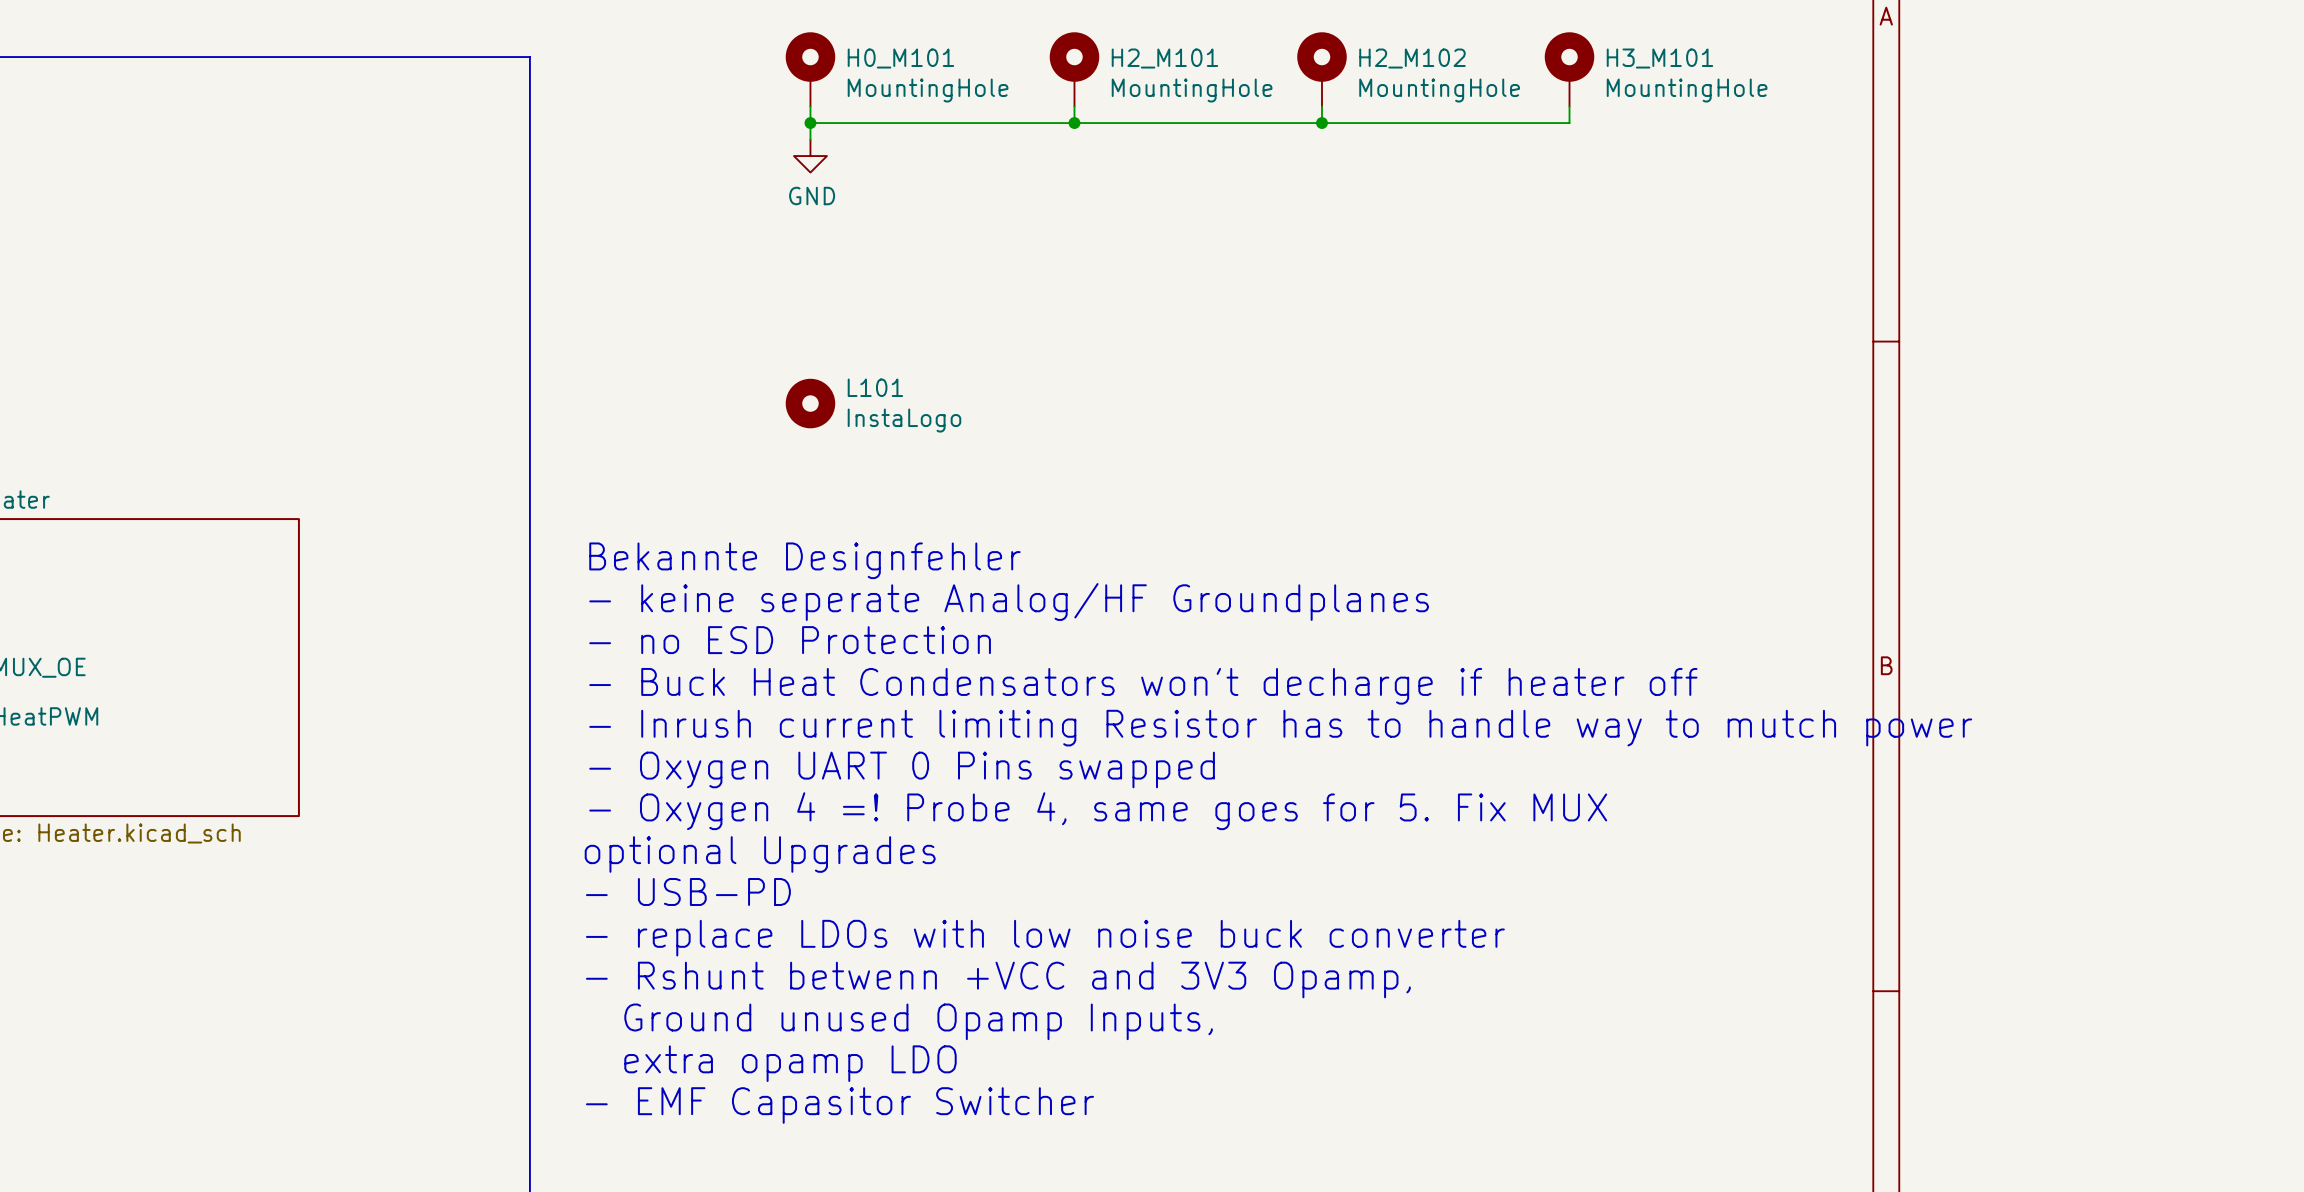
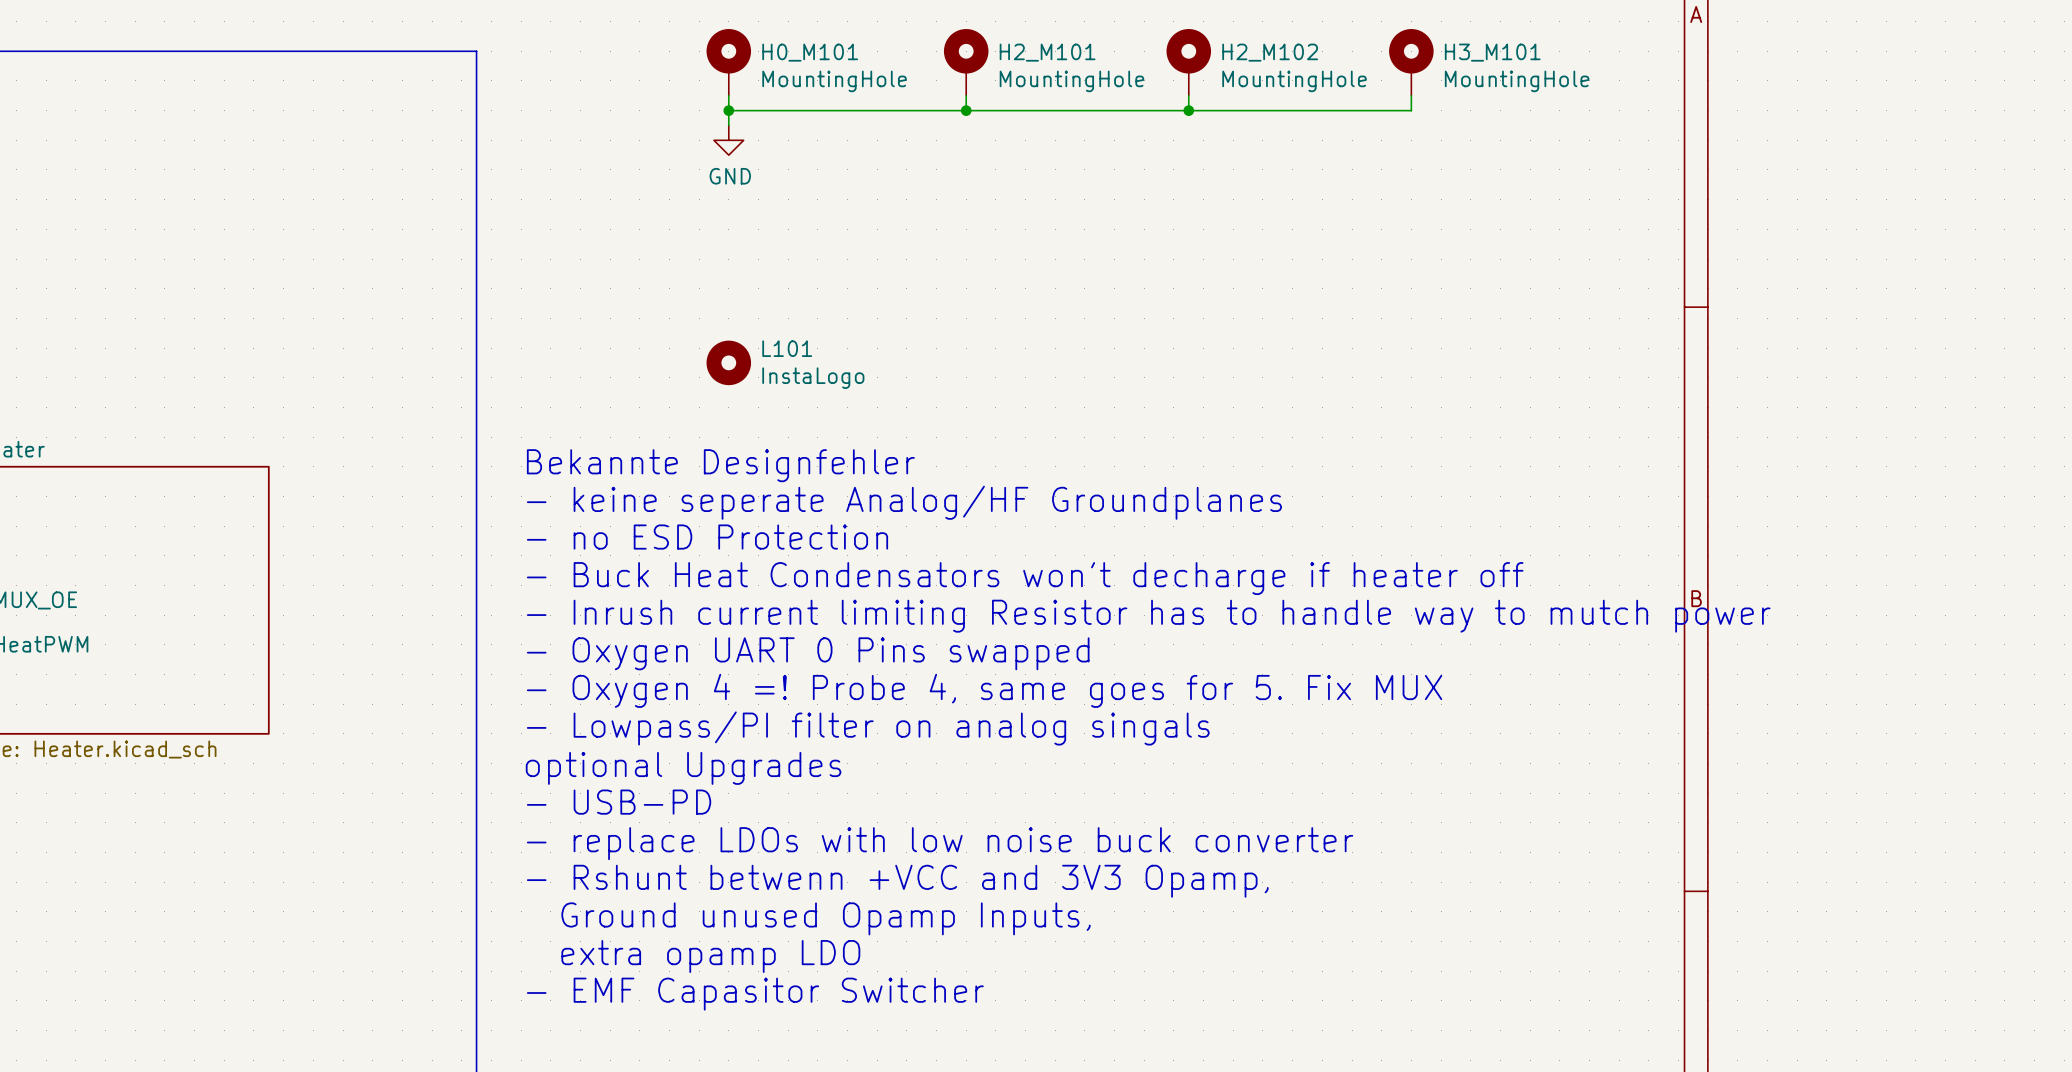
text position: Bekannte Designfehler (804, 560) -> Bekannte Designfehler (720, 465)
text position: - keine seperate Analog/HF Groundplanes (1009, 601) -> - keine seperate Analog/HF Groundplanes (904, 502)
text position: - no ESD Protection (790, 640) -> - no ESD Protection (707, 537)
text position: - Buck Heat Condensators won't decharge if heater off (1143, 686) -> - Buck Heat Condensators won't decharge if heater off (1025, 578)
text position: - Inrush current limiting Resistor has to handle way to mutch power (1280, 728) -> - Inrush current limiting Resistor has to handle way to mutch power (1148, 616)
text position: - Oxygen UART 0 Pins swapped (902, 769) -> - Oxygen UART 0 Pins swapped (808, 653)
text: none -> - Lowpass/PI filter on analog singals (868, 728)
text position: - Oxygen 4 =! Probe 4, same goes for 5. Fix MUX (1098, 811) -> - Oxygen 4 =! Probe 4, same goes for 5. Fix MUX (984, 690)

